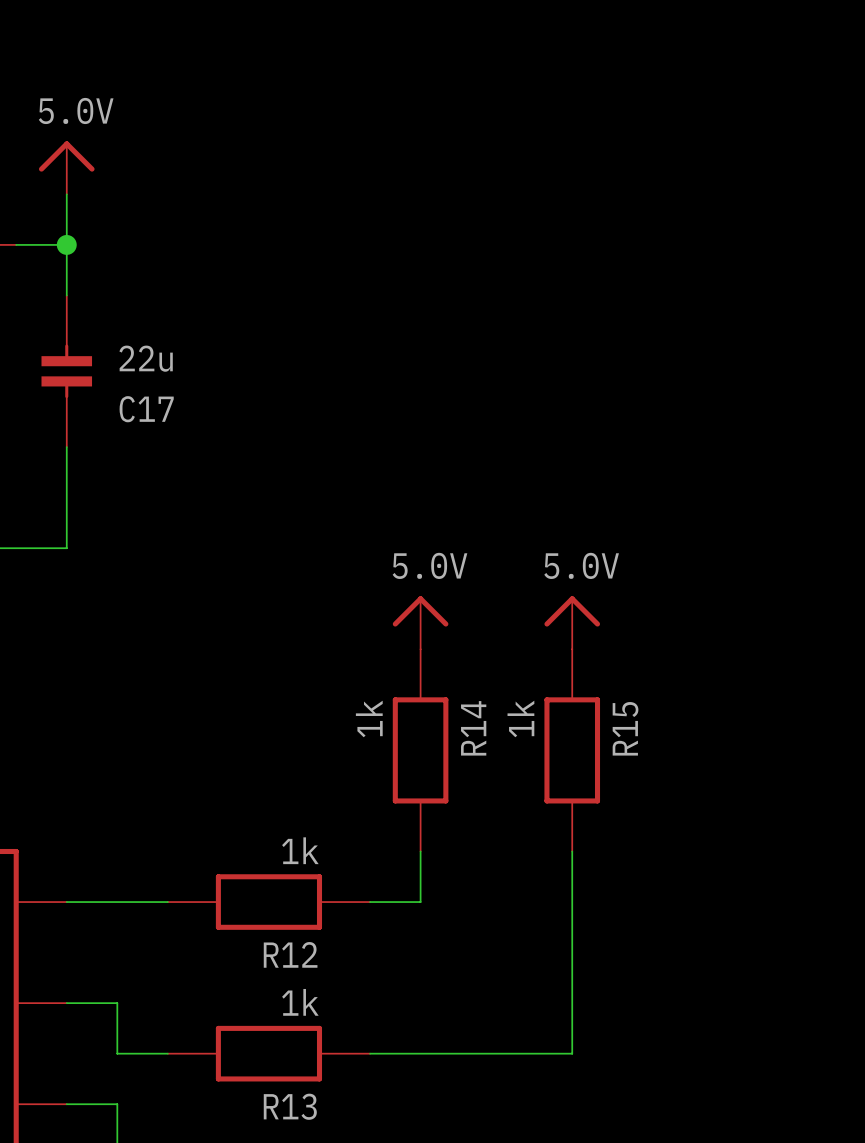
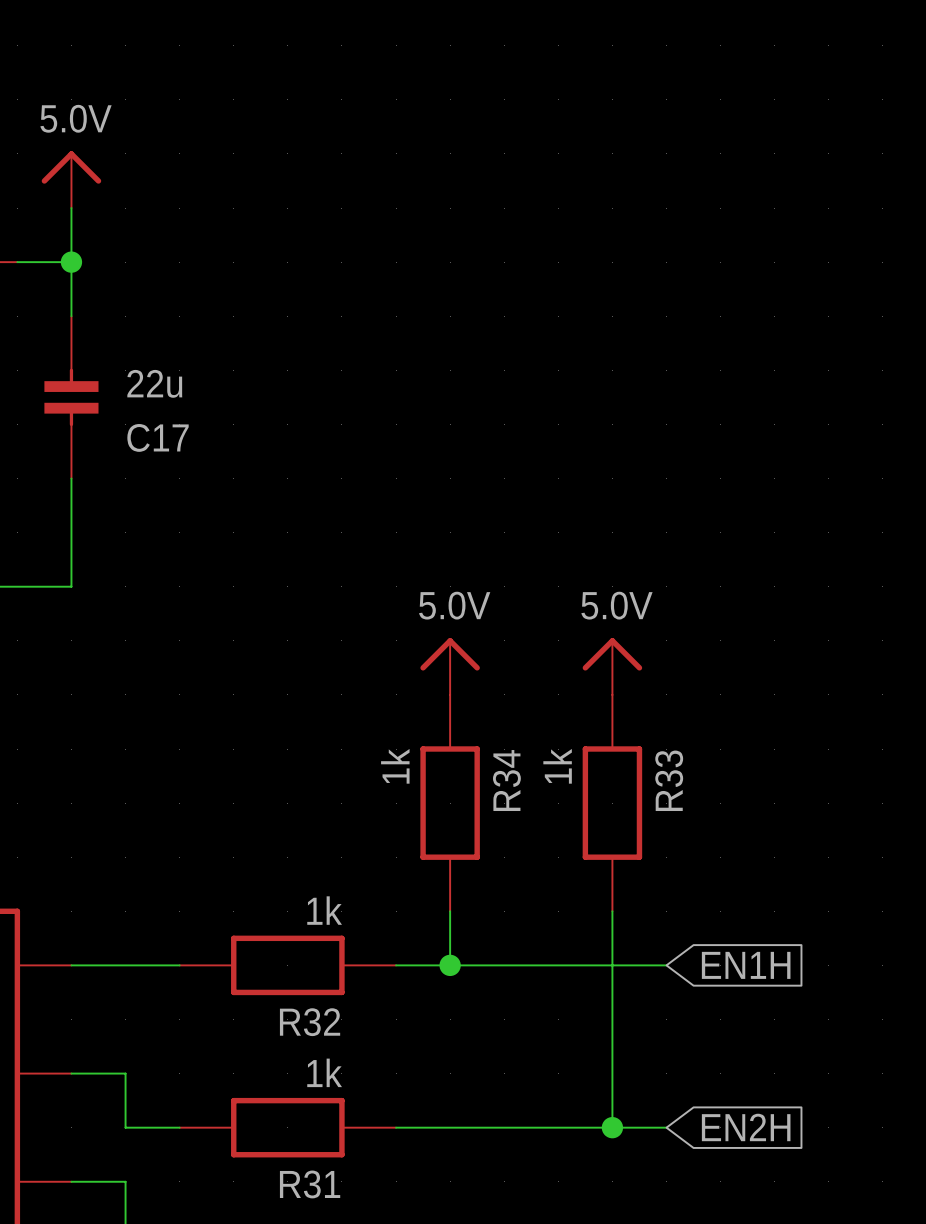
R14 name: R14 (473, 728) -> R34 (506, 780)
R15 name: R15 (625, 728) -> R33 (669, 780)
wire: none -> (450, 965) (666, 965)
junction: none -> (450, 965)
global label: none -> EN1H (746, 965)
R12 name: R12 (290, 954) -> R32 (310, 1022)
wire: none -> (612, 1127) (666, 1127)
junction: none -> (612, 1127)
global label: none -> EN2H (746, 1127)
R13 name: R13 (290, 1106) -> R31 (310, 1184)

